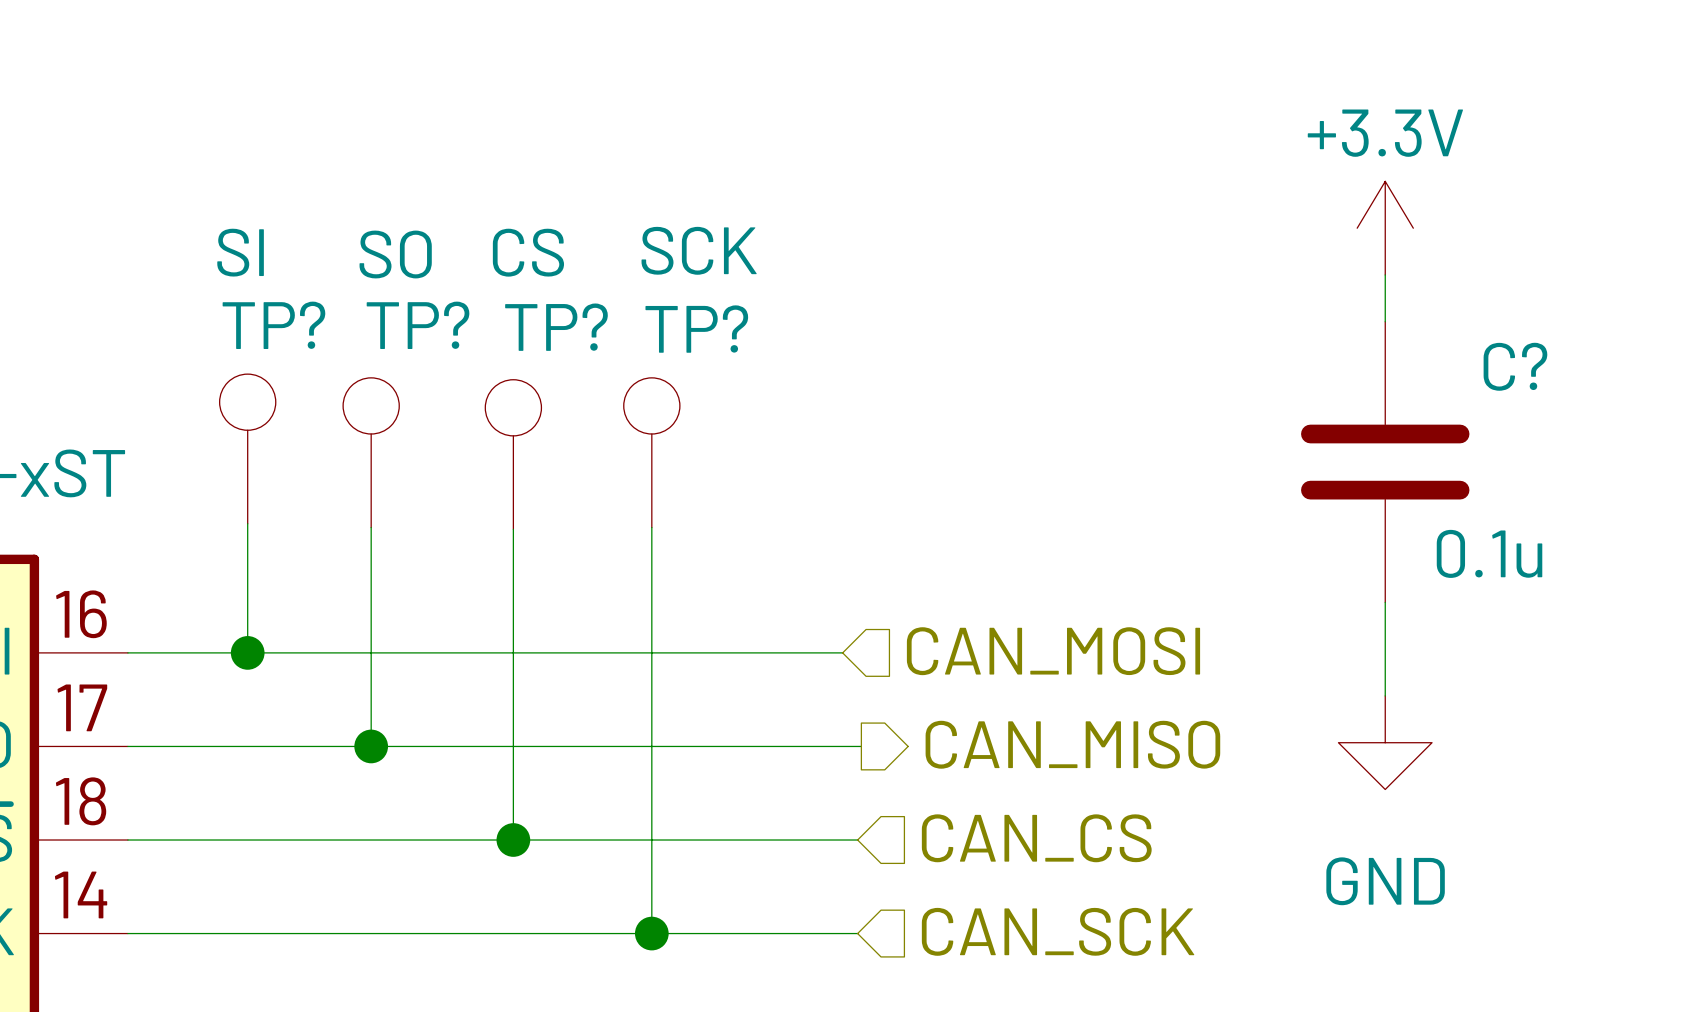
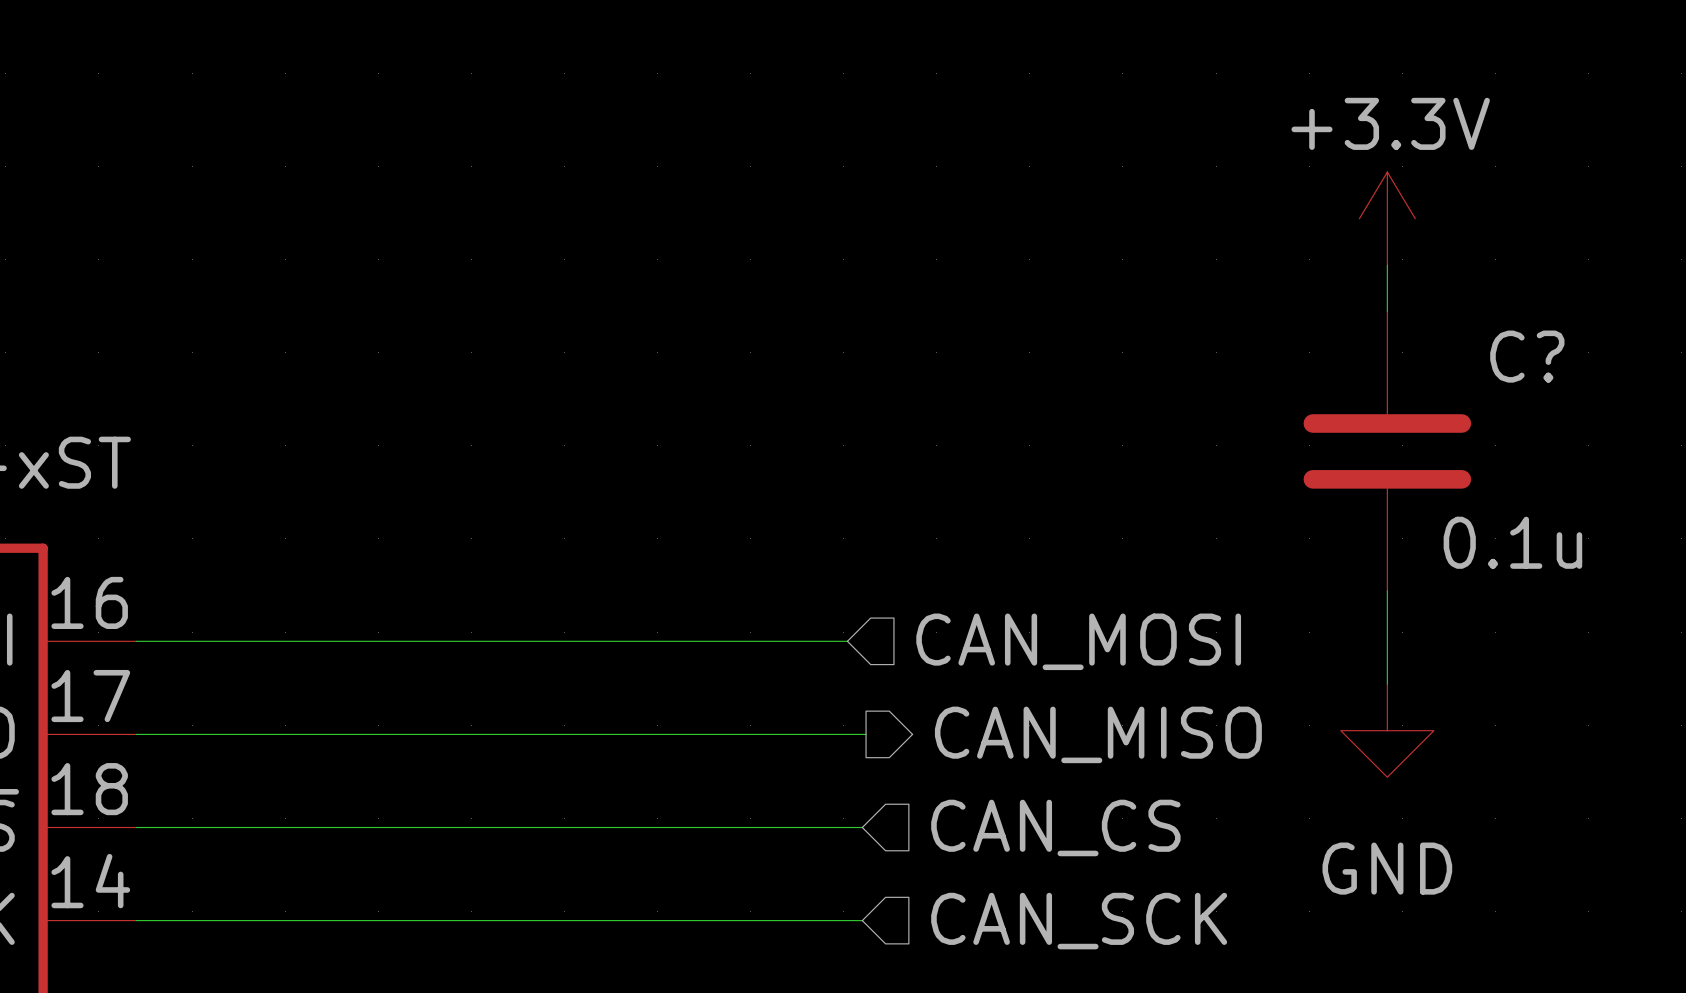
TP?: SI (247, 448) -> none
TP?: SO (371, 452) -> none
TP?: SCK (651, 452) -> none
TP?: CS (513, 454) -> none
wire: (247, 523) (247, 652) -> none
wire: (371, 527) (371, 746) -> none
wire: (651, 527) (651, 933) -> none
wire: (513, 529) (513, 840) -> none
junction: (247, 652) -> none
junction: (371, 746) -> none
junction: (513, 840) -> none
junction: (651, 933) -> none

